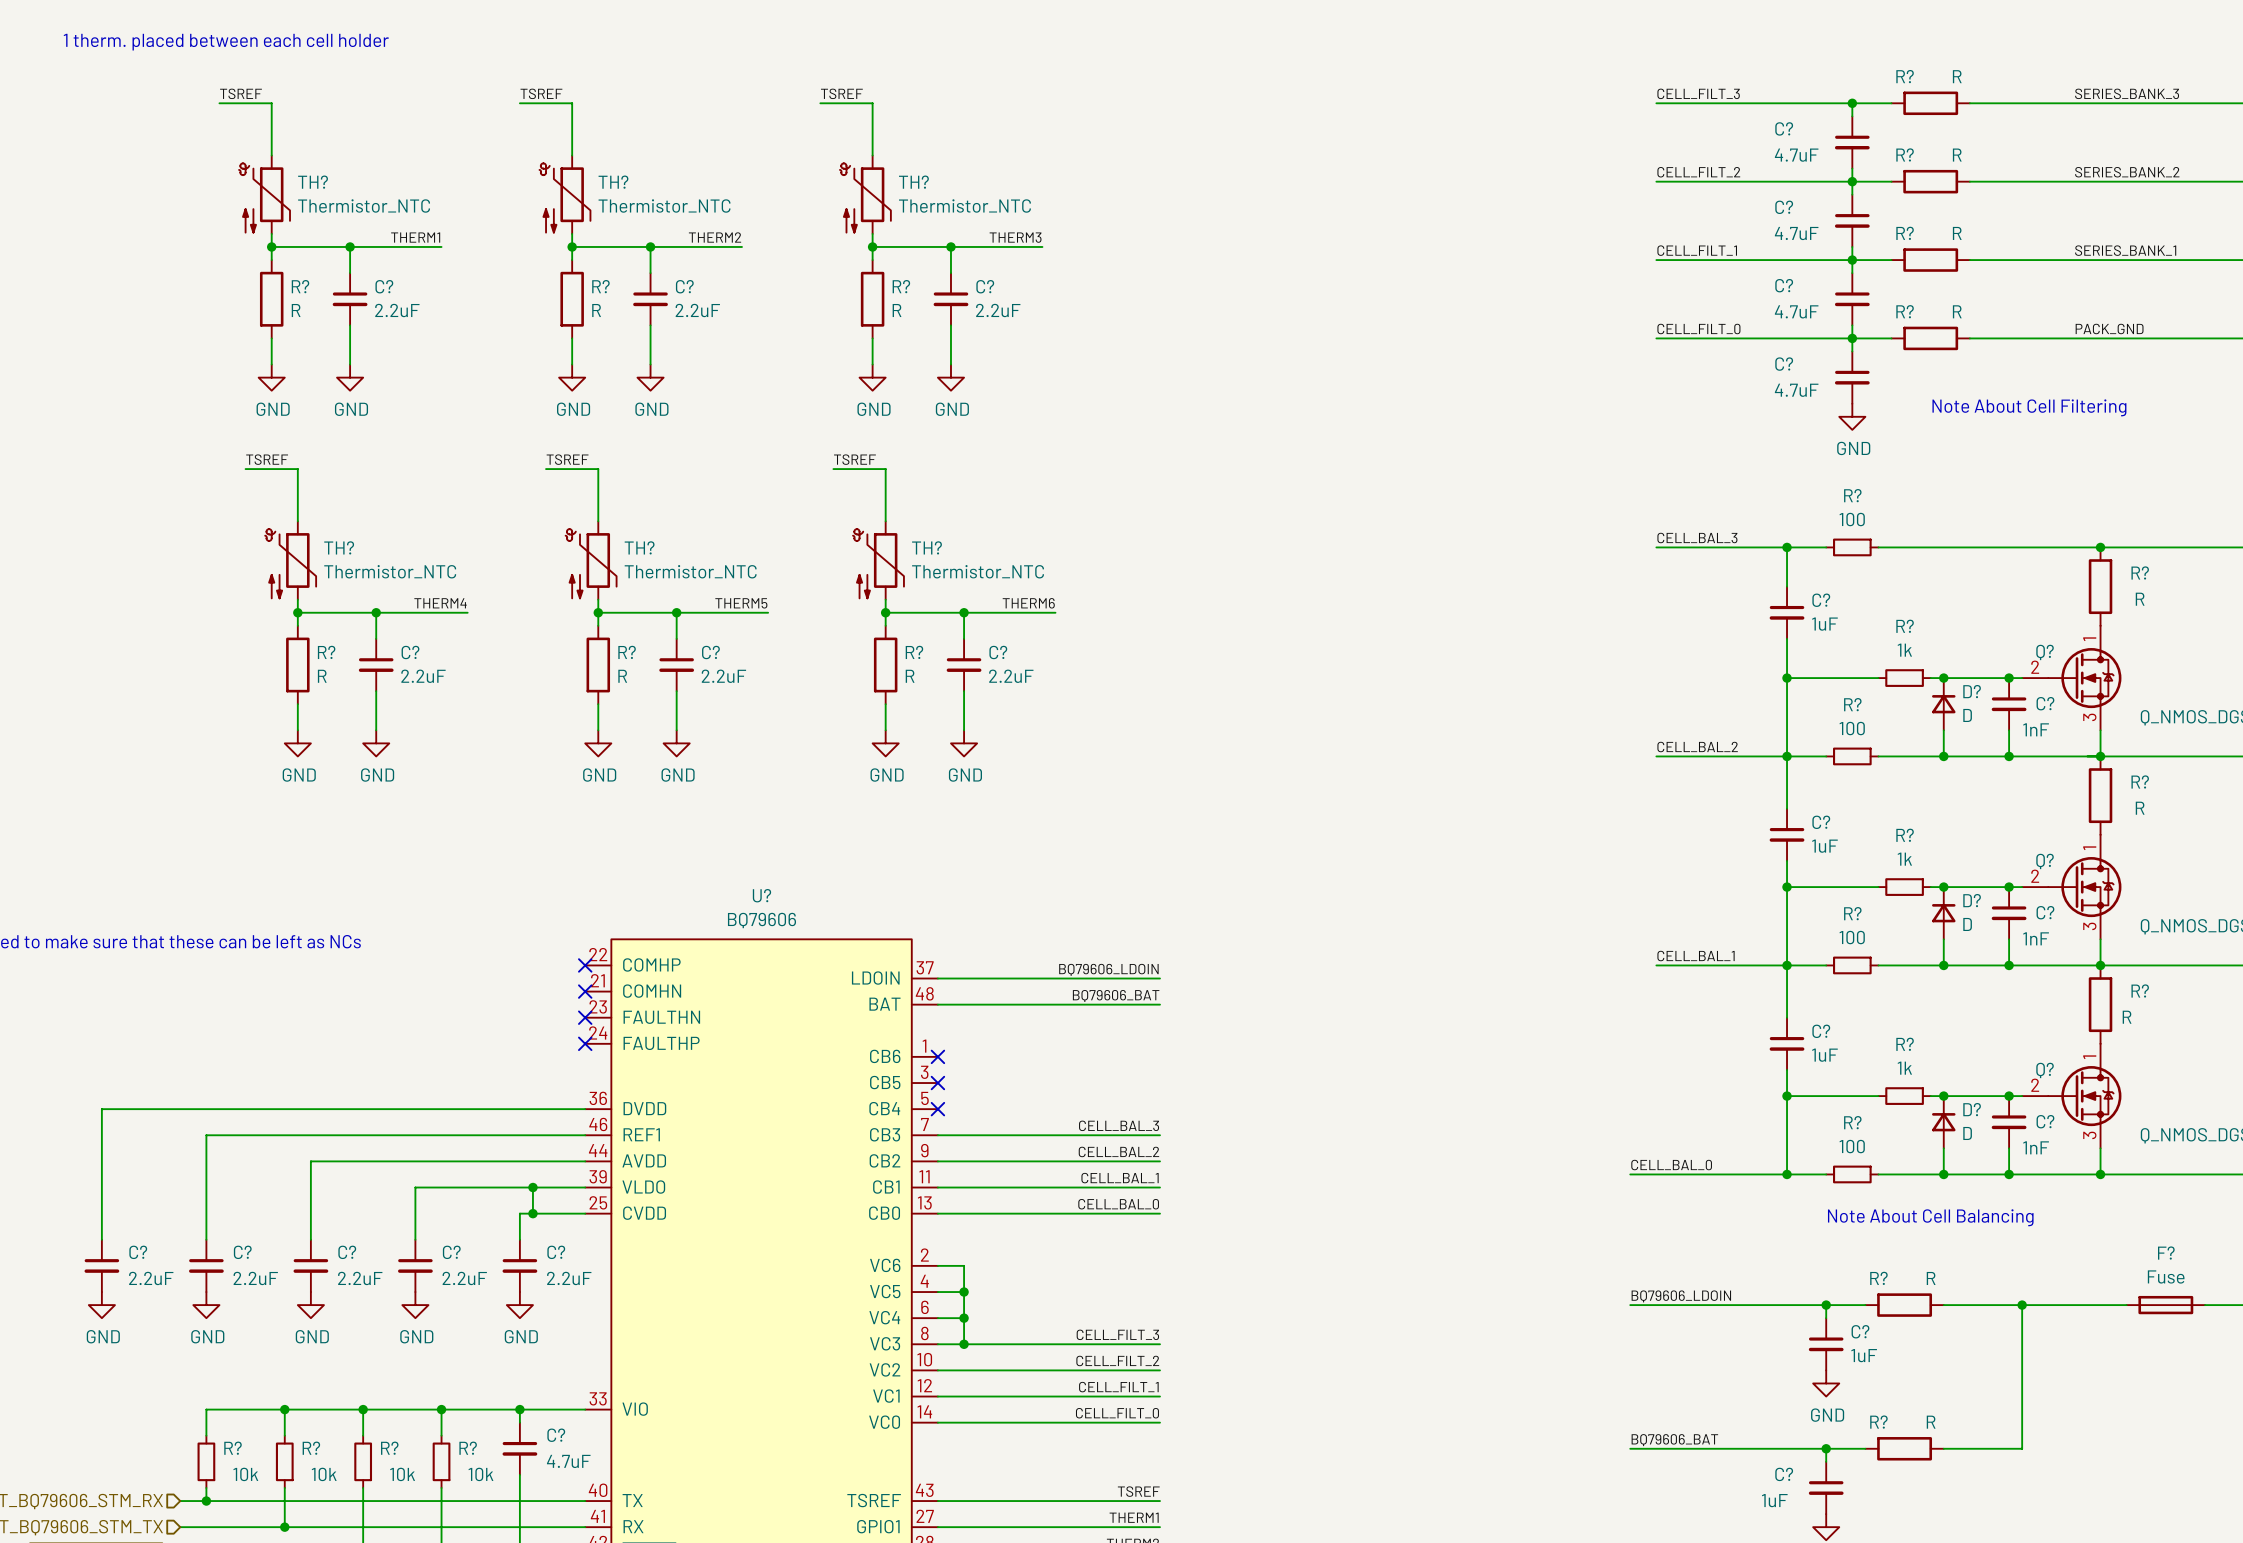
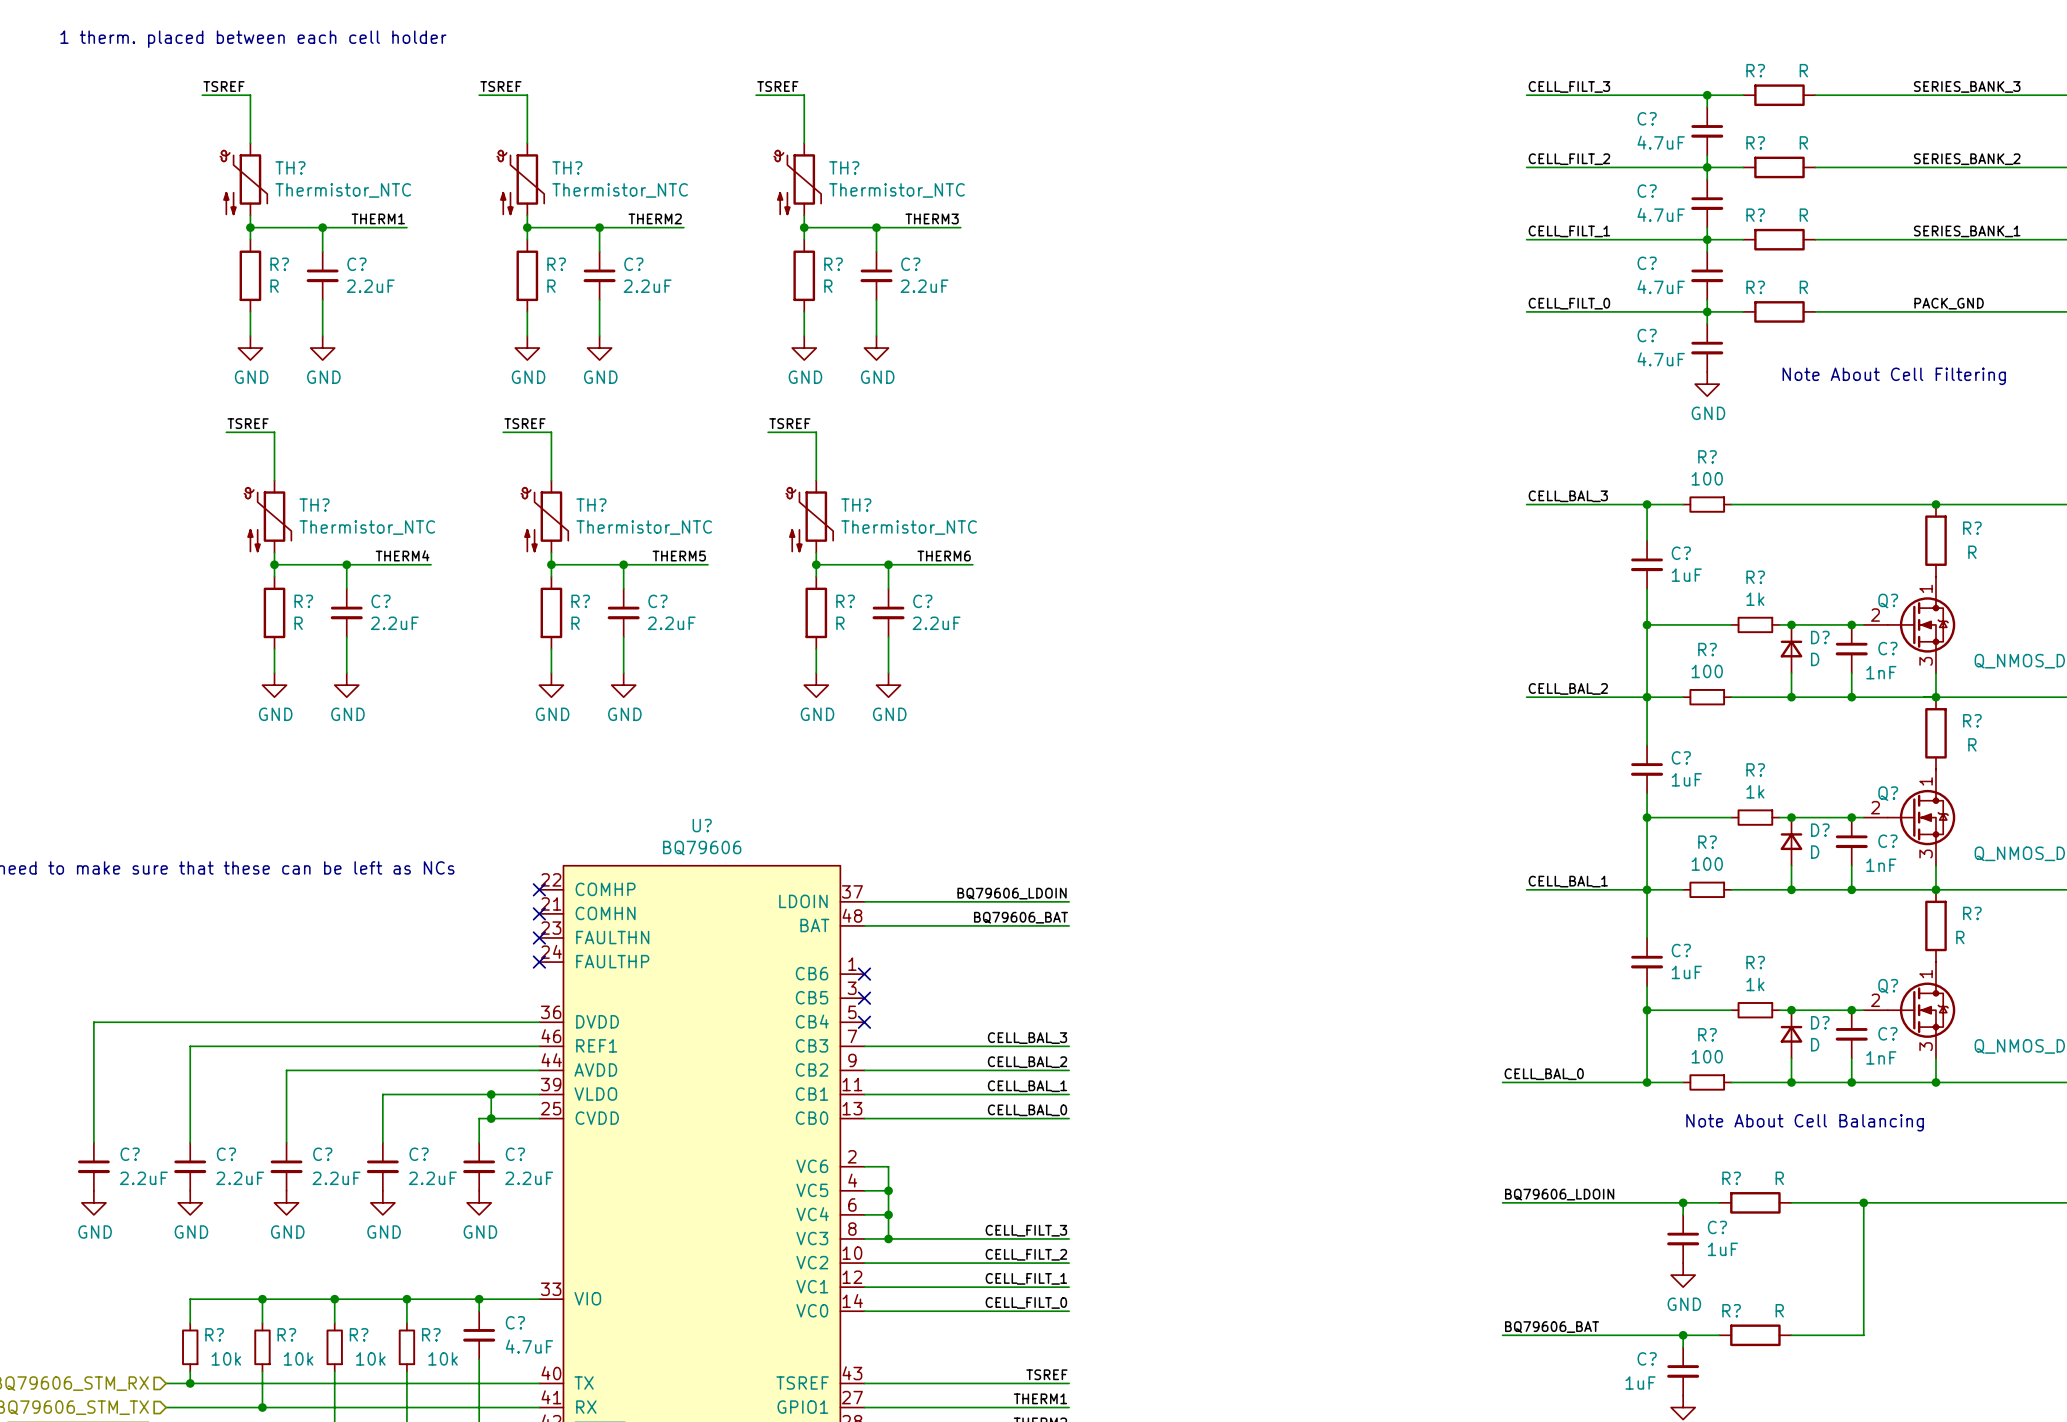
F?: Fuse (2165, 1305) -> none

